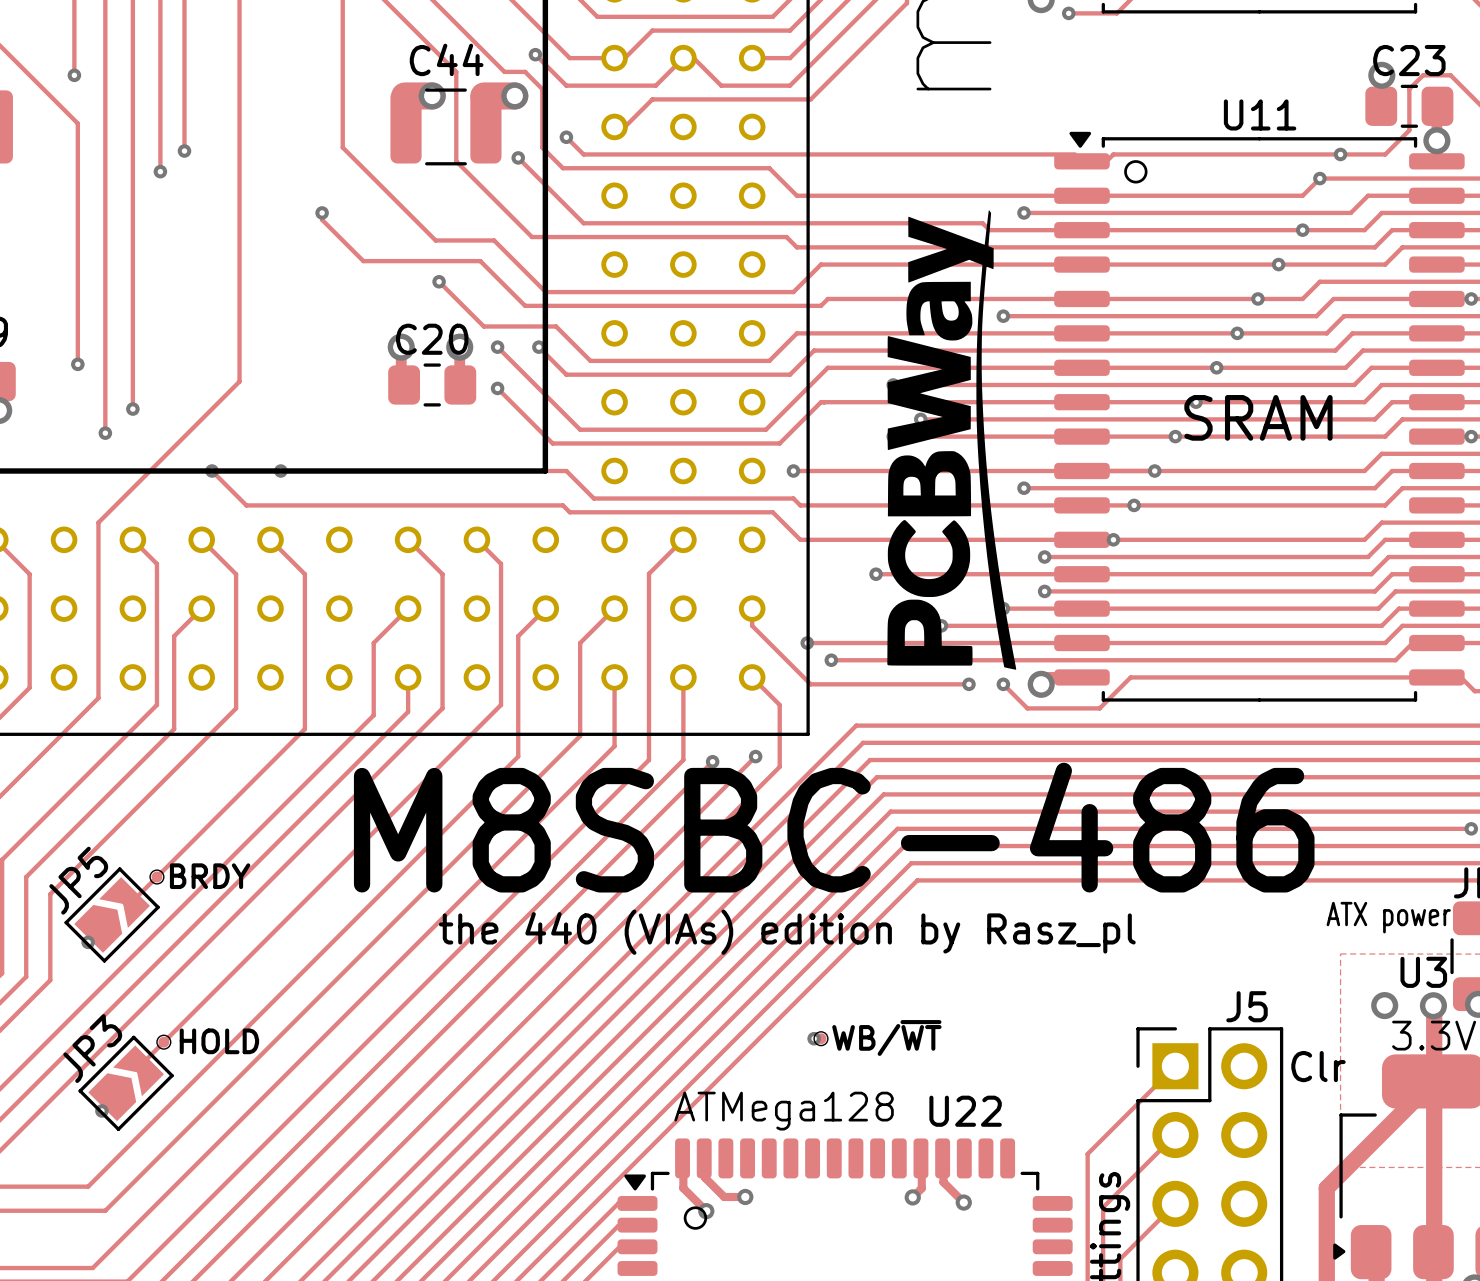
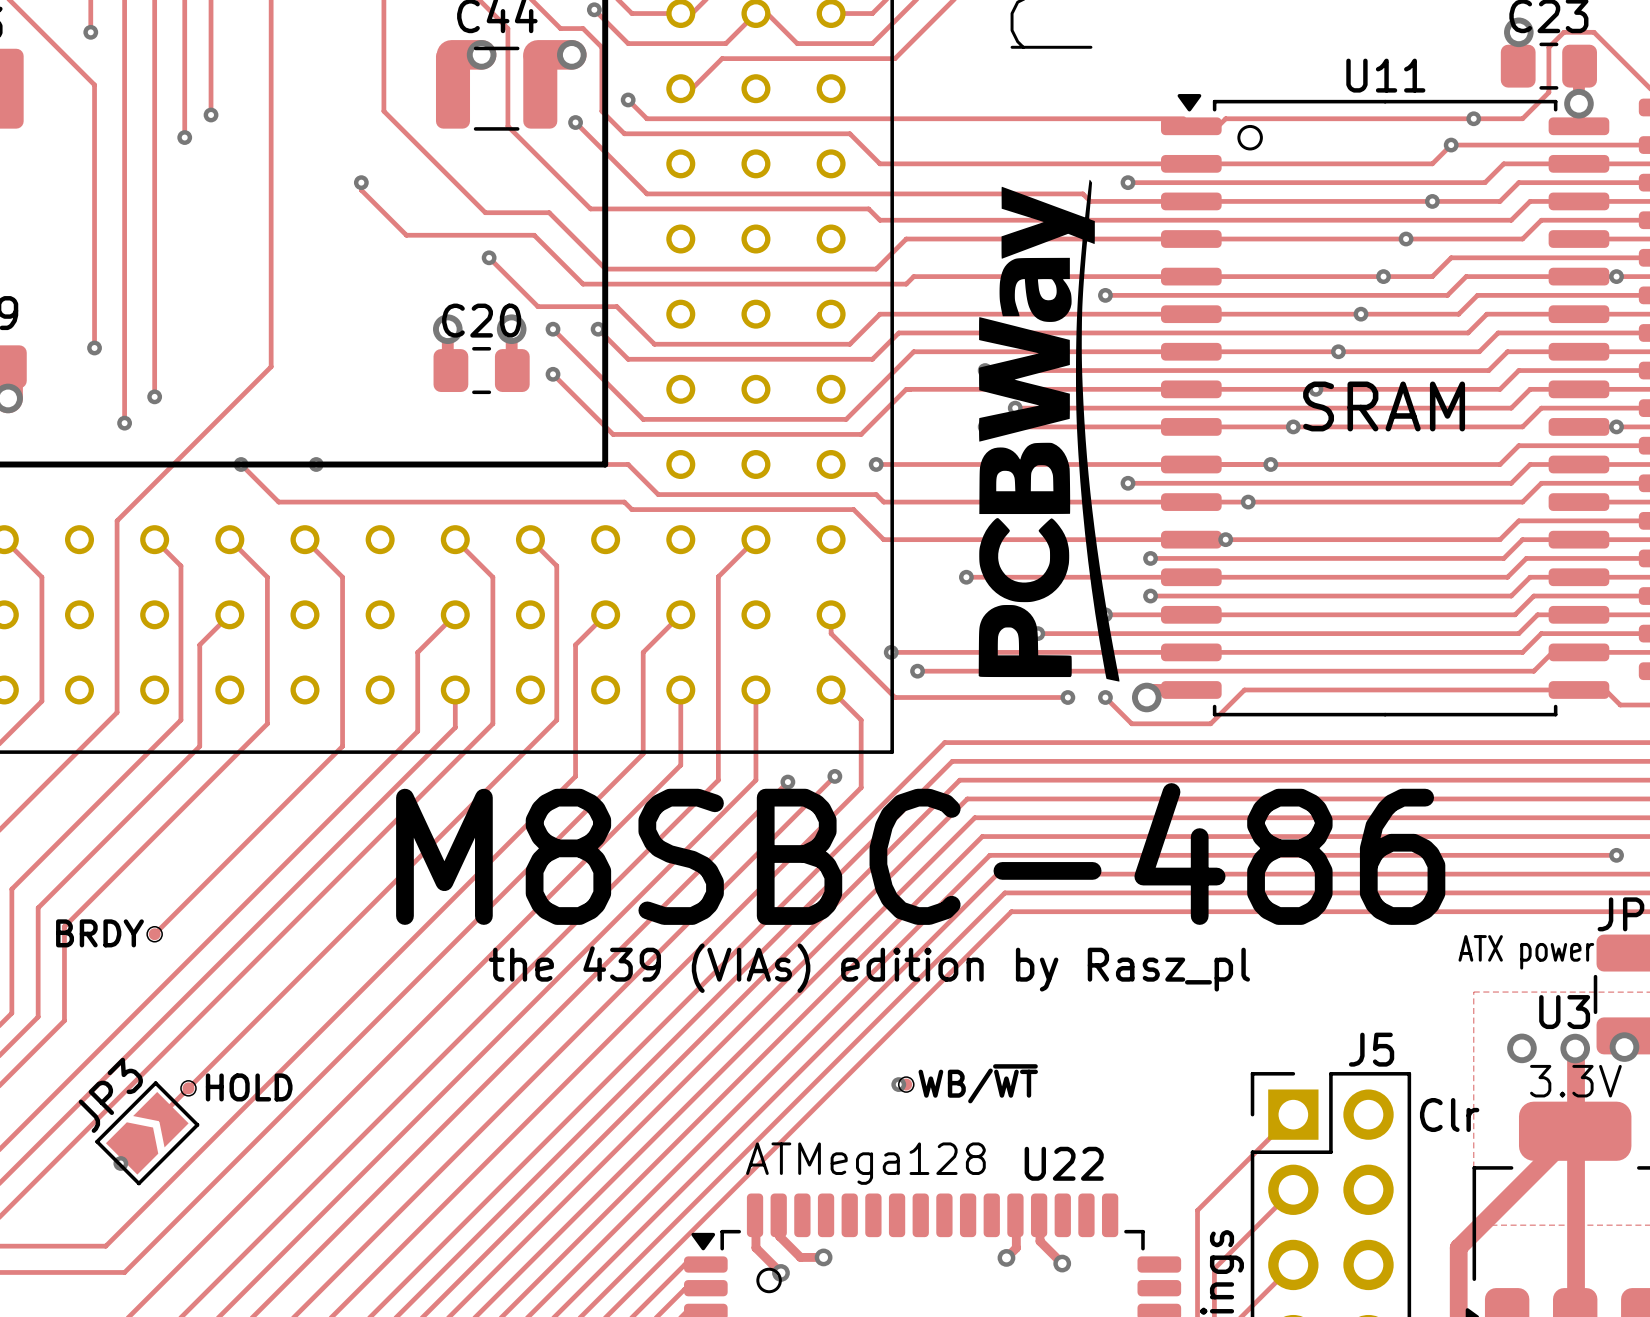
part value position: BRDY (210, 876) -> BRDY (99, 933)
part position: (156, 877) -> (154, 934)
JP5: (112, 914) -> none
text: the 440 (VIAs) edition by Rasz_pl (787, 932) -> the 439 (VIAs) edition by Rasz_pl (869, 968)
via: (88, 942) -> none

